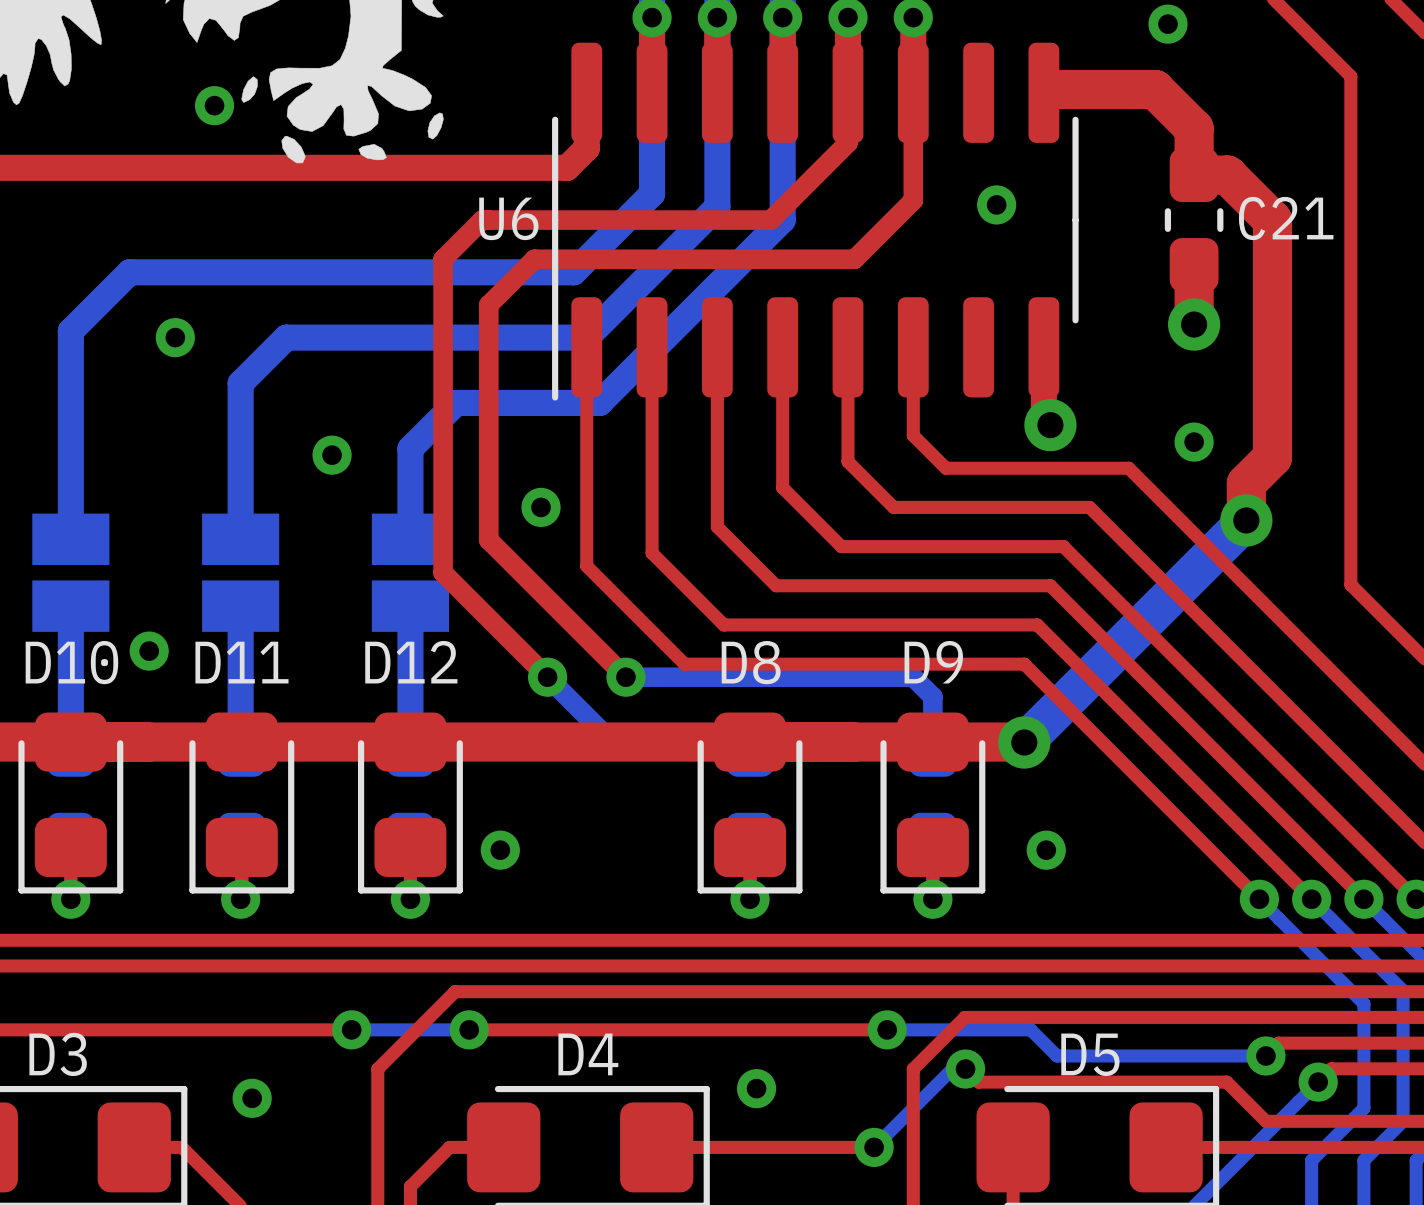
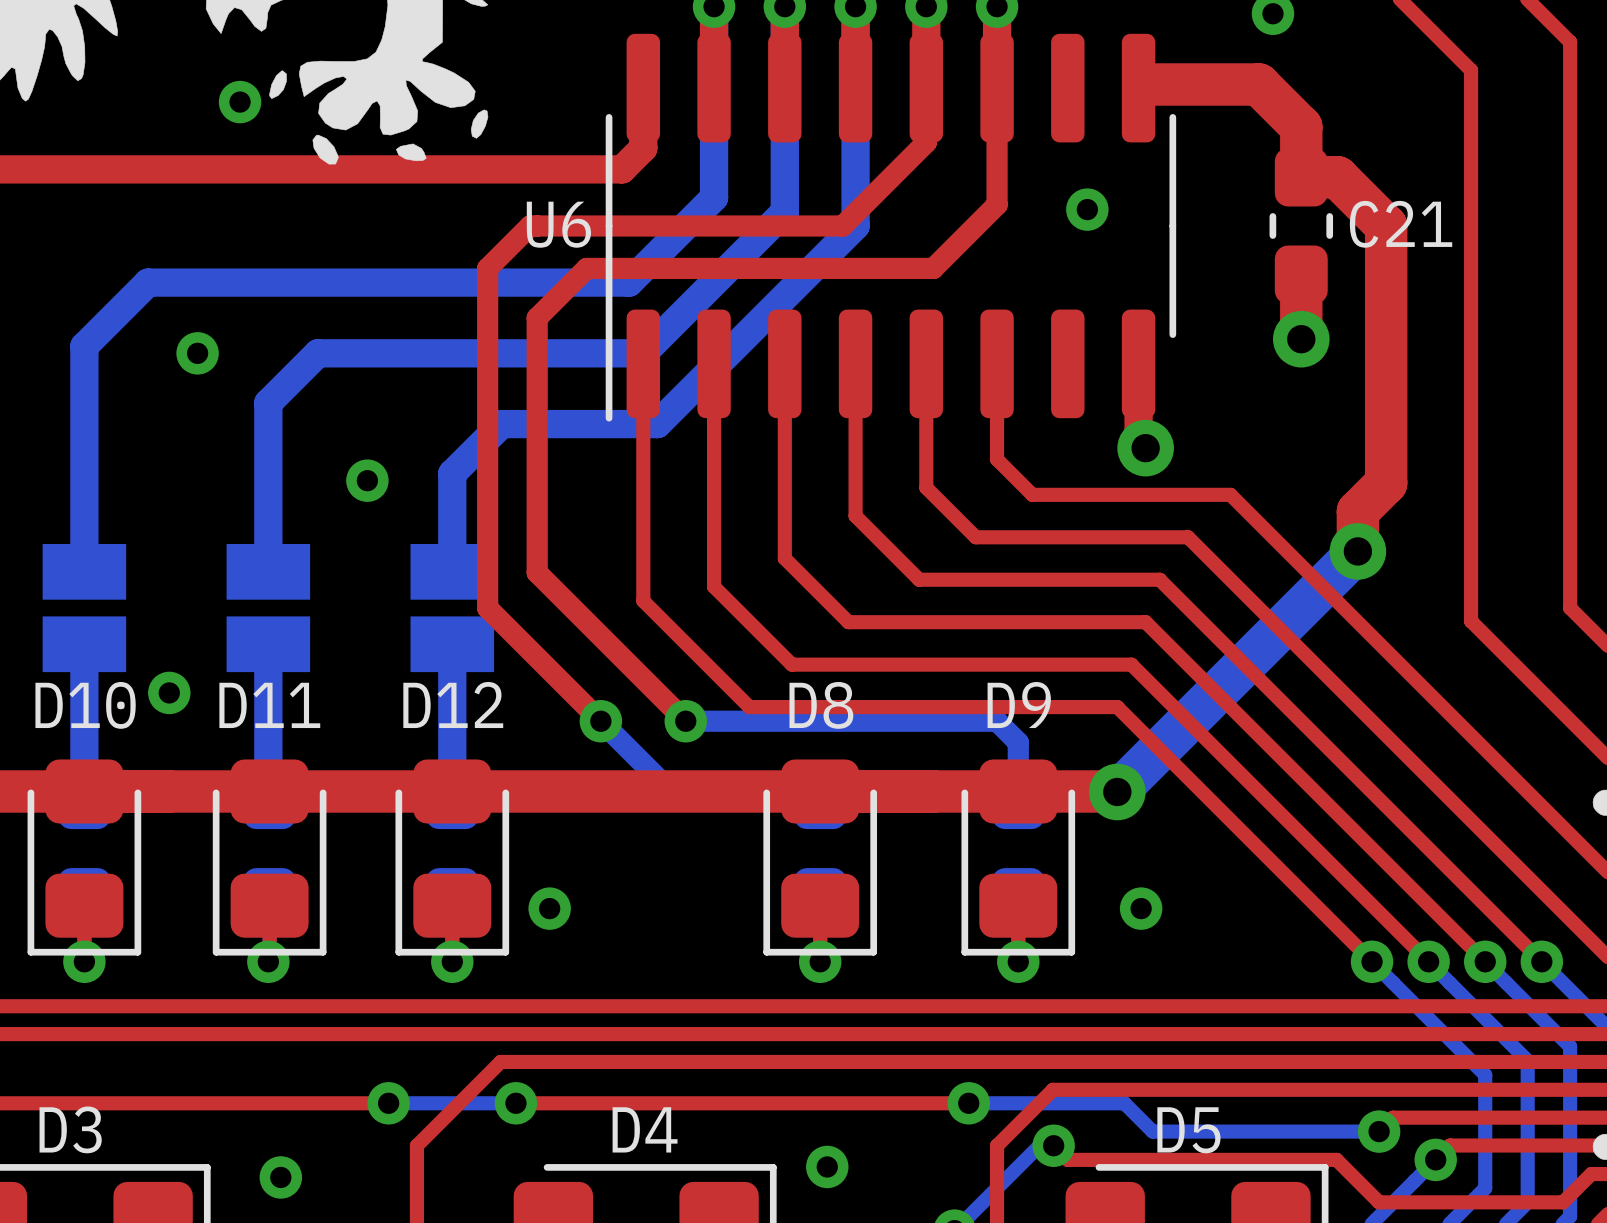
via: (1194, 442) -> none
via: (541, 507) -> none

